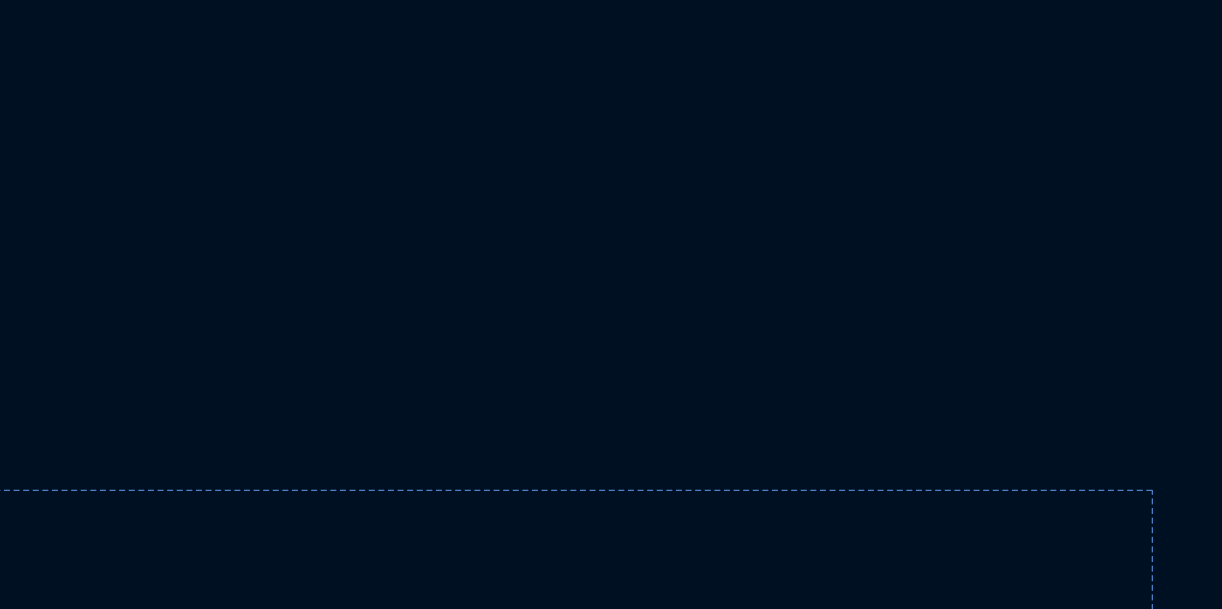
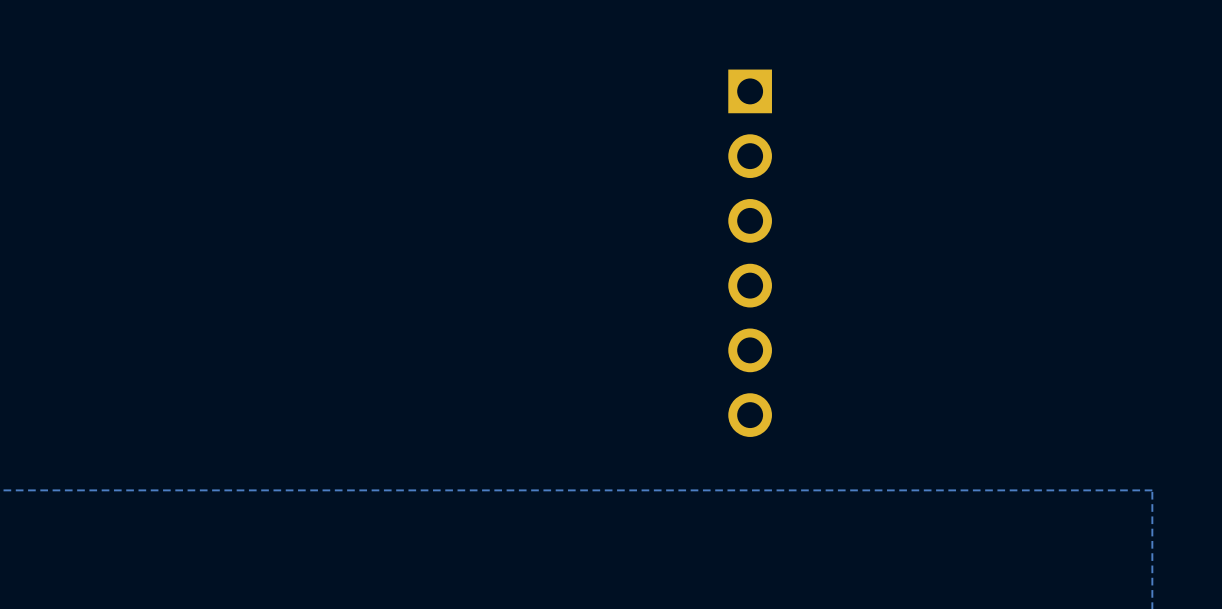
part: none -> (750, 253)

